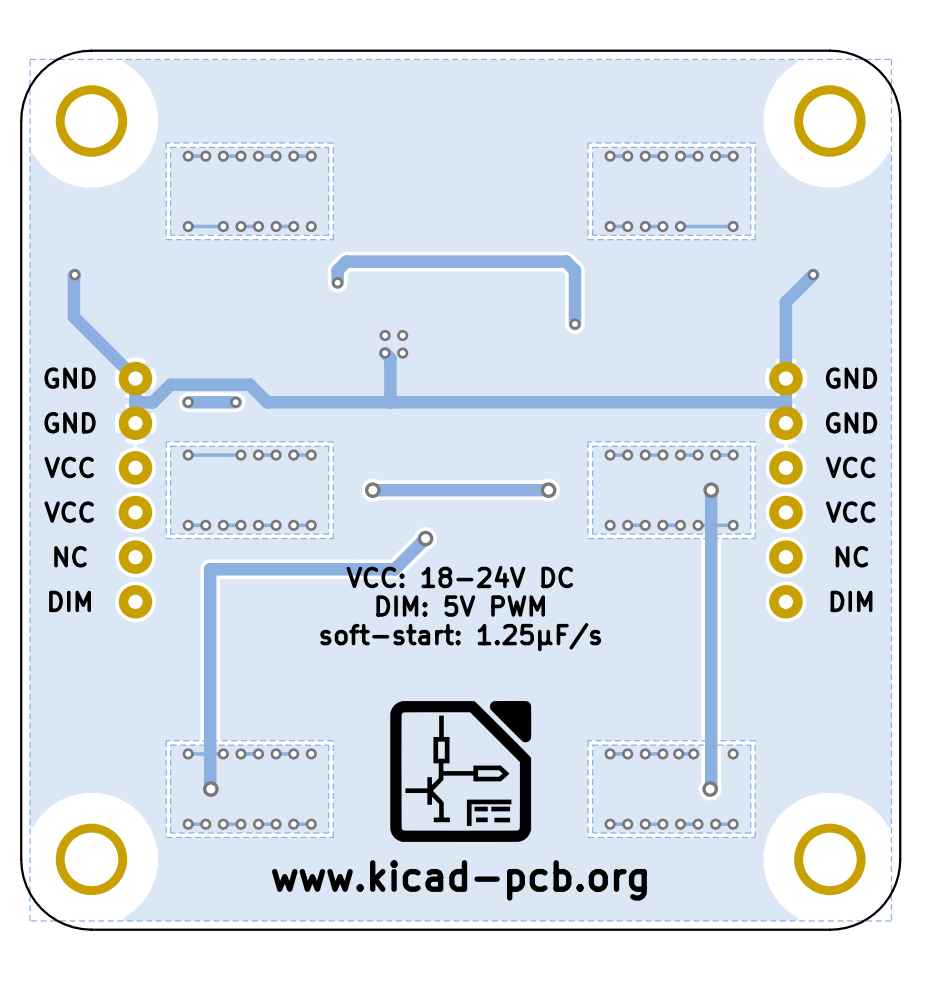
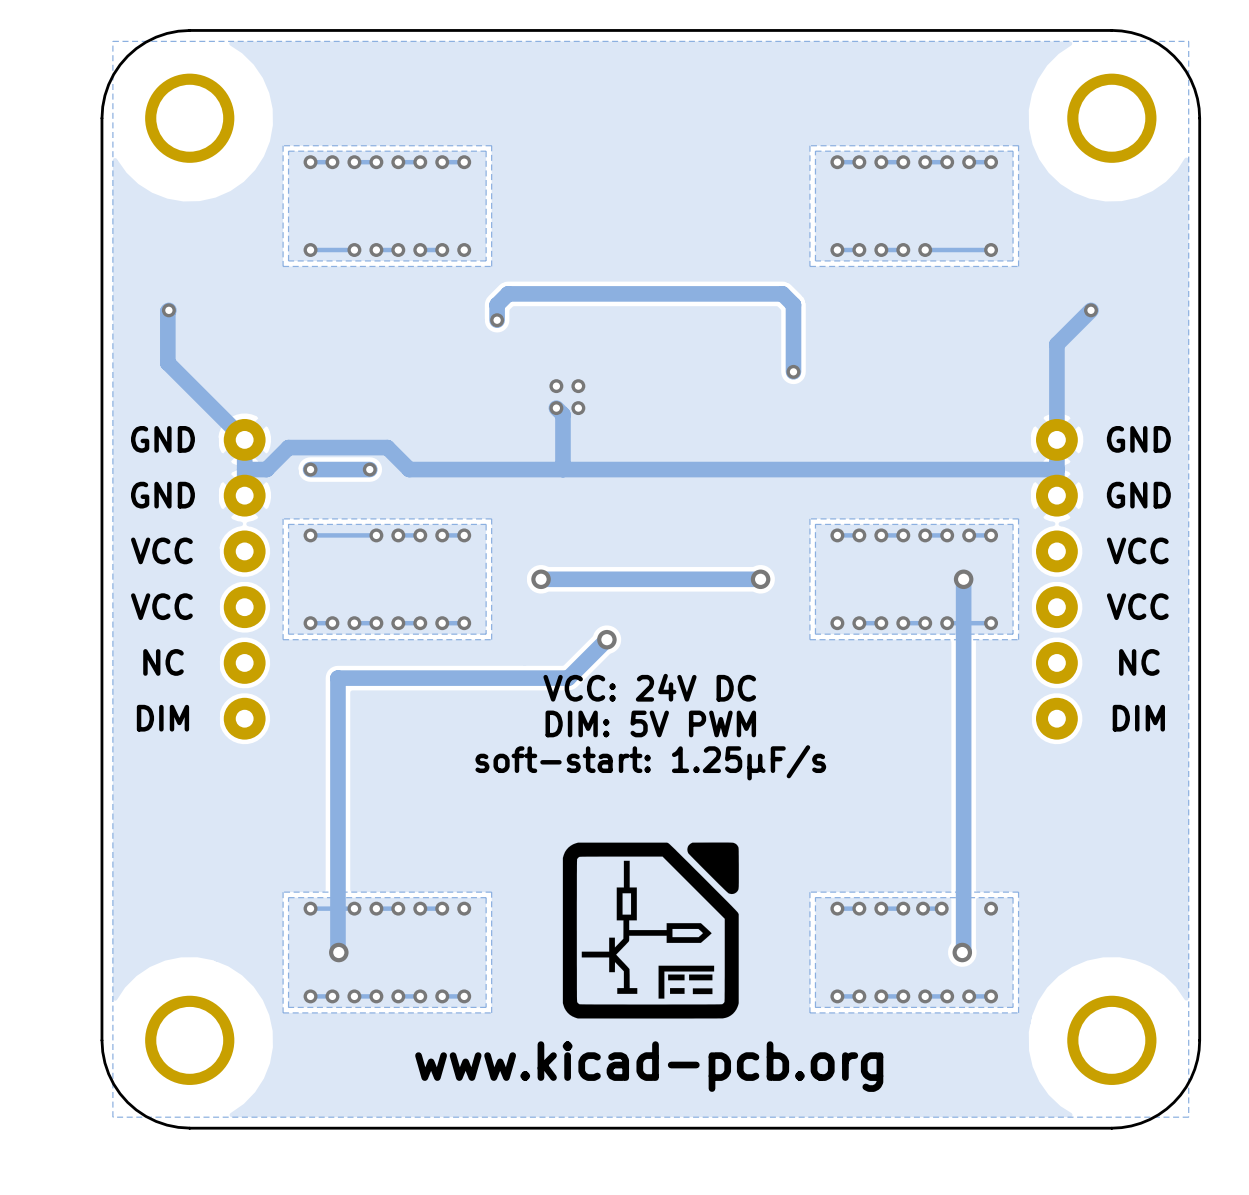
text: VCC: 18-24V DC (459, 577) -> VCC: 24V DC (649, 687)

